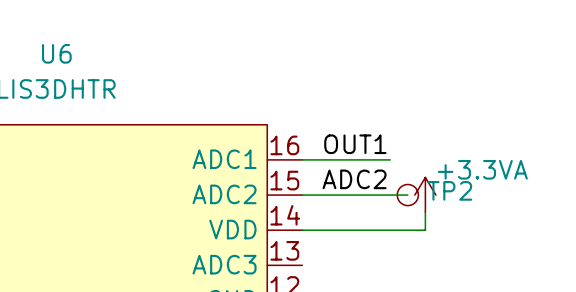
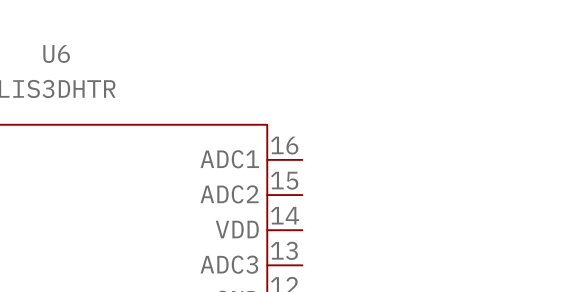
label: OUT1 (355, 144) -> none
wire: (302, 159) (390, 159) -> none
label: ADC2 (354, 179) -> none
wire: (302, 195) (407, 195) -> none
TP2: (407, 195) -> none
power symbol: +3.3VA (425, 195) -> none
wire: (425, 212) (425, 230) (302, 230) -> none

